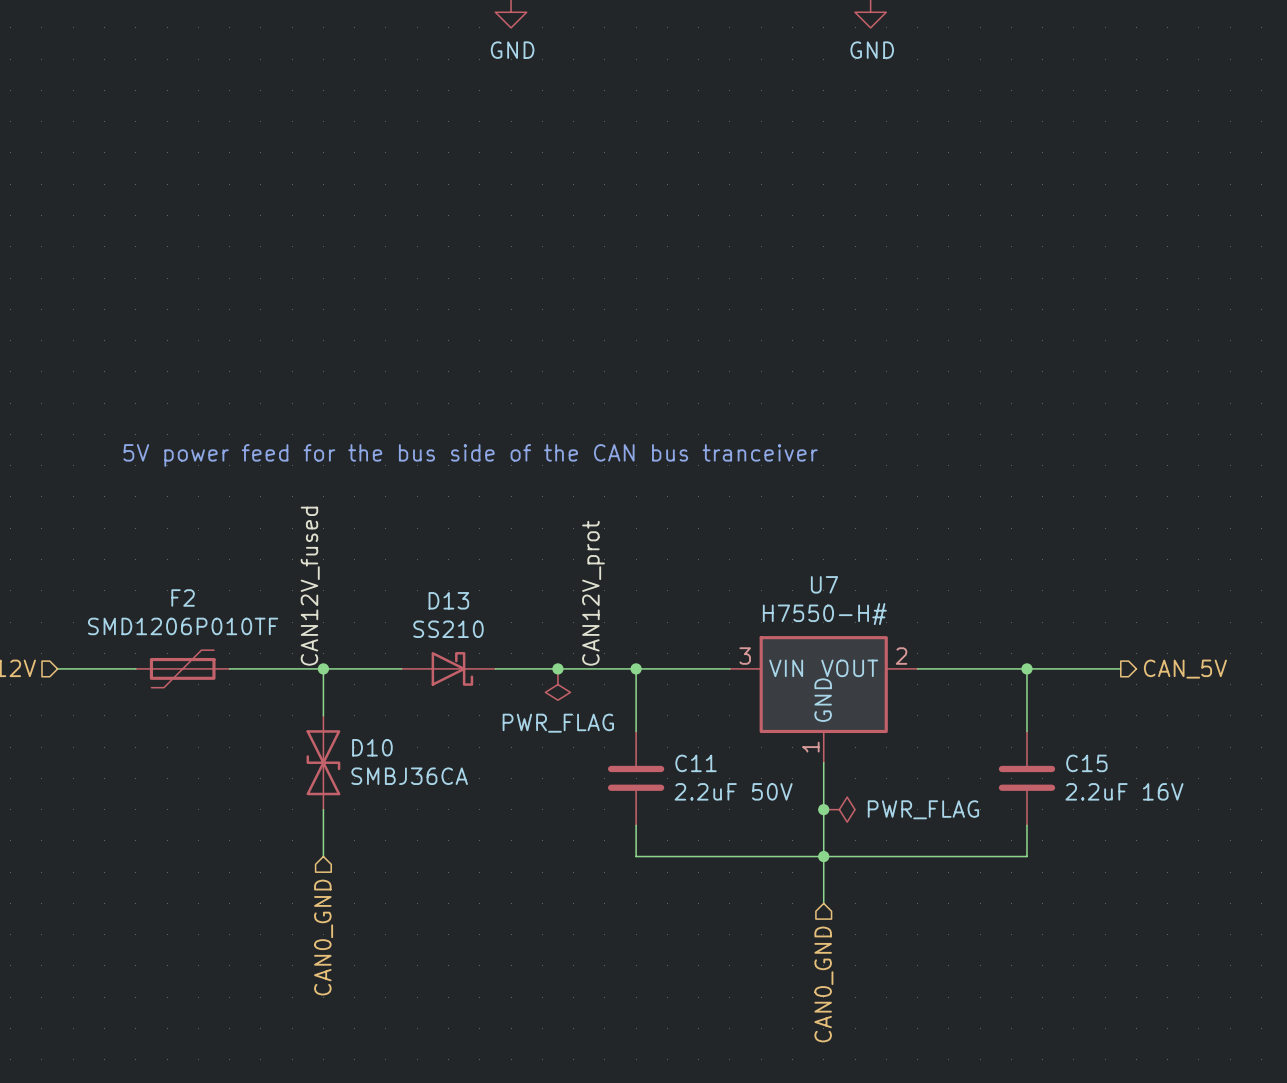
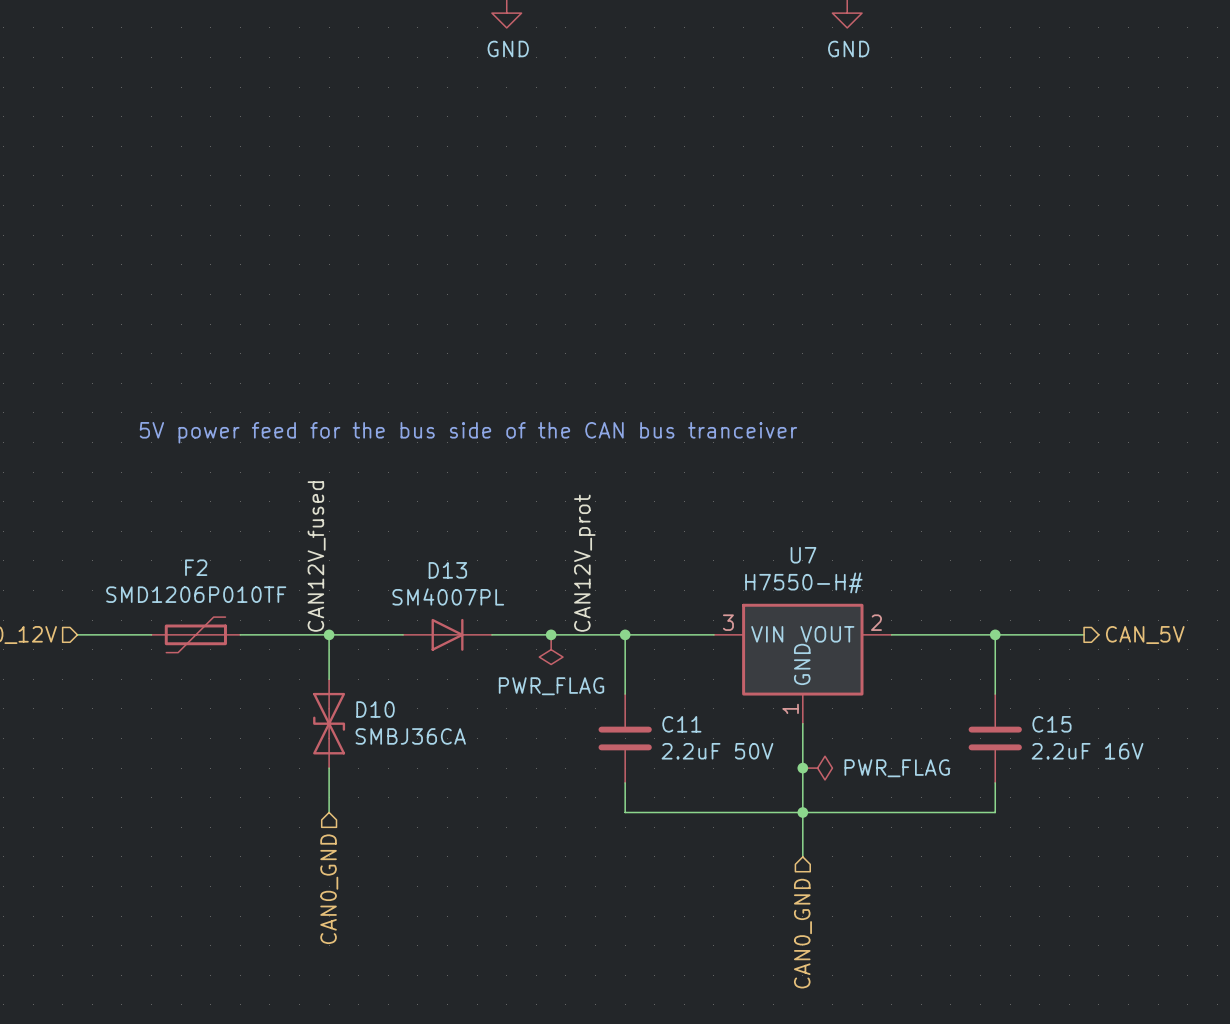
D13 value: SS210 (448, 629) -> SM4007PL (448, 596)
D13 symbol: [401, 652, 496, 686] -> [403, 618, 492, 651]

